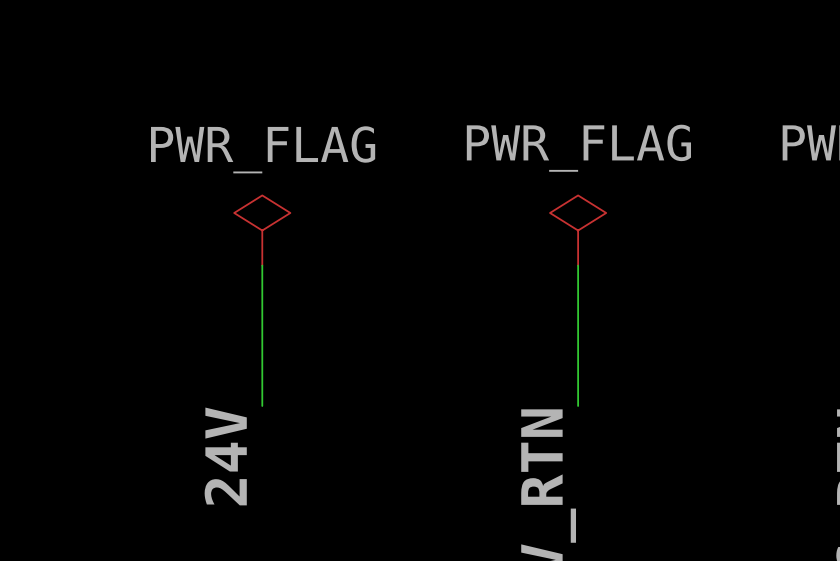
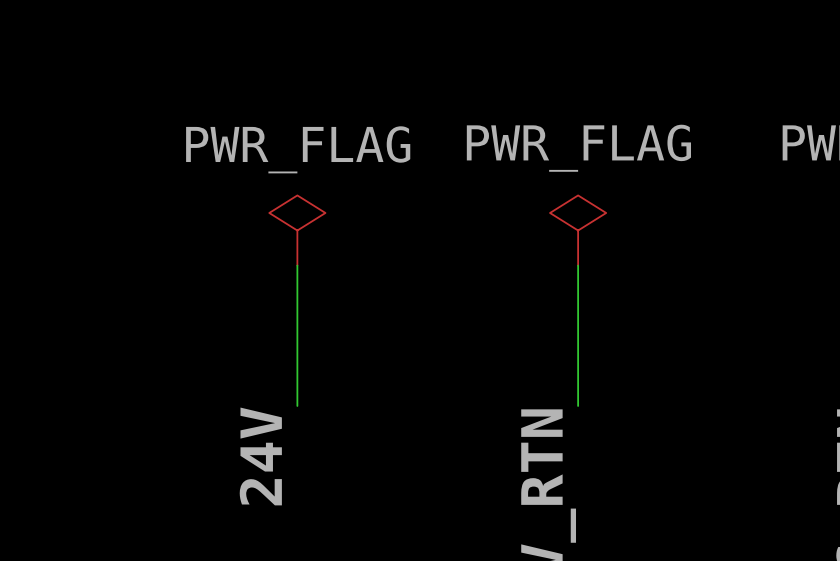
power symbol position: PWR_FLAG (262, 230) -> PWR_FLAG (297, 230)
wire: (262, 265) (262, 405) -> (297, 265) (297, 405)
label position: 24V (225, 456) -> 24V (260, 456)

